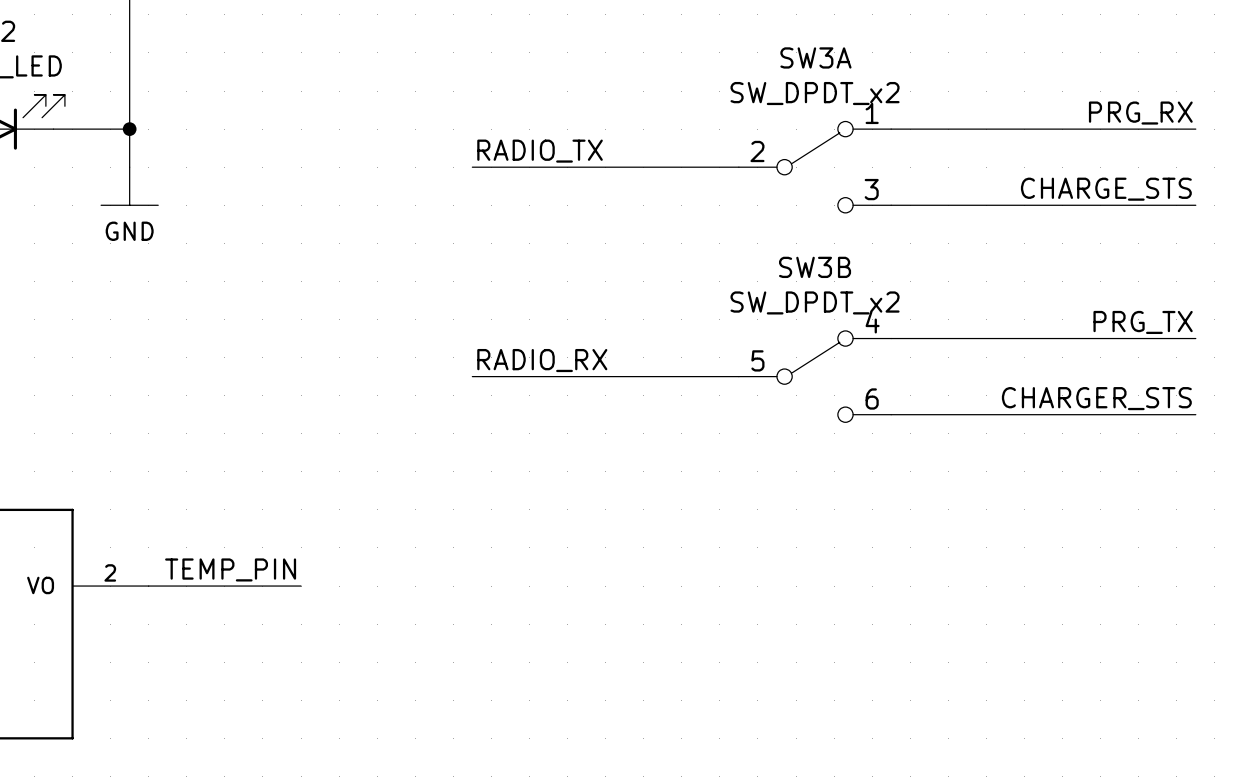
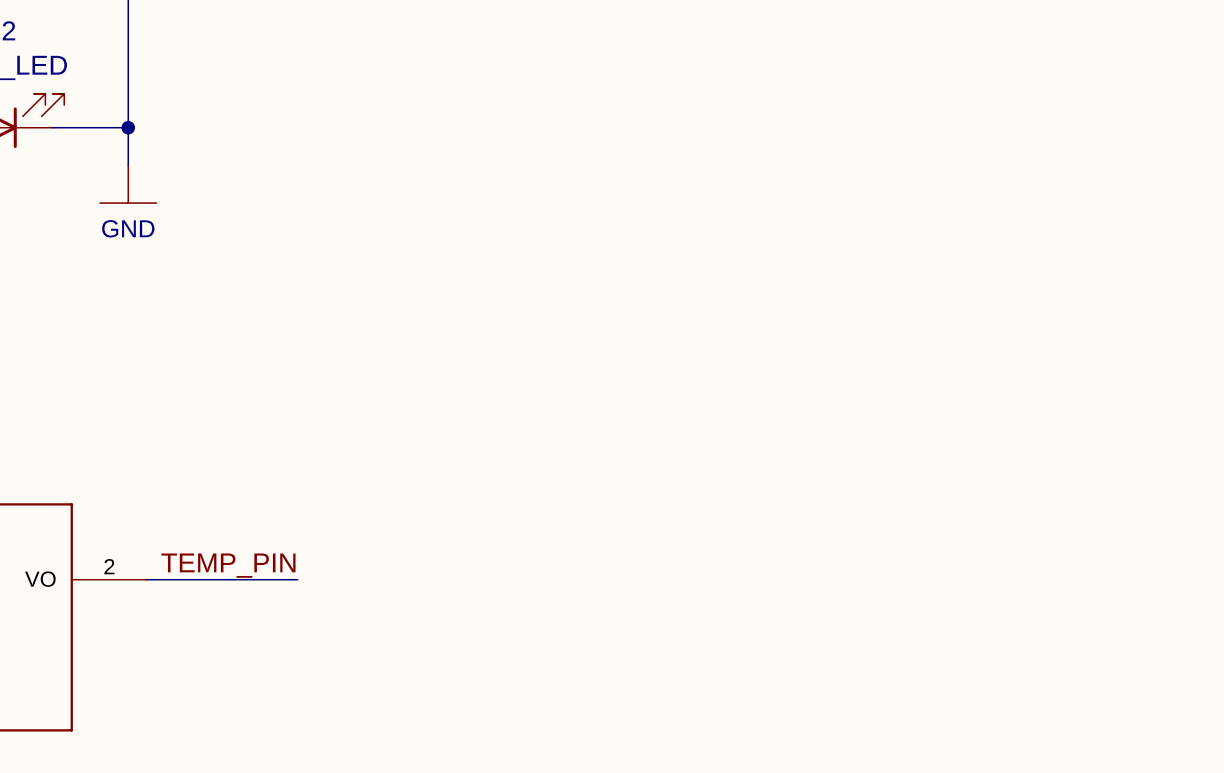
label: PRG_RX (1140, 113) -> none
wire: (891, 129) (1195, 129) -> none
label: RADIO_TX (540, 151) -> none
wire: (472, 167) (738, 167) -> none
SW3A: SW_DPDT_x2 (815, 167) -> none
label: CHARGE_STS (1106, 189) -> none
wire: (891, 205) (1195, 205) -> none
label: PRG_TX (1143, 322) -> none
wire: (891, 338) (1195, 338) -> none
label: RADIO_RX (542, 360) -> none
wire: (472, 376) (738, 376) -> none
SW3B: SW_DPDT_x2 (815, 376) -> none
label: CHARGER_STS (1096, 398) -> none
wire: (891, 414) (1195, 414) -> none

